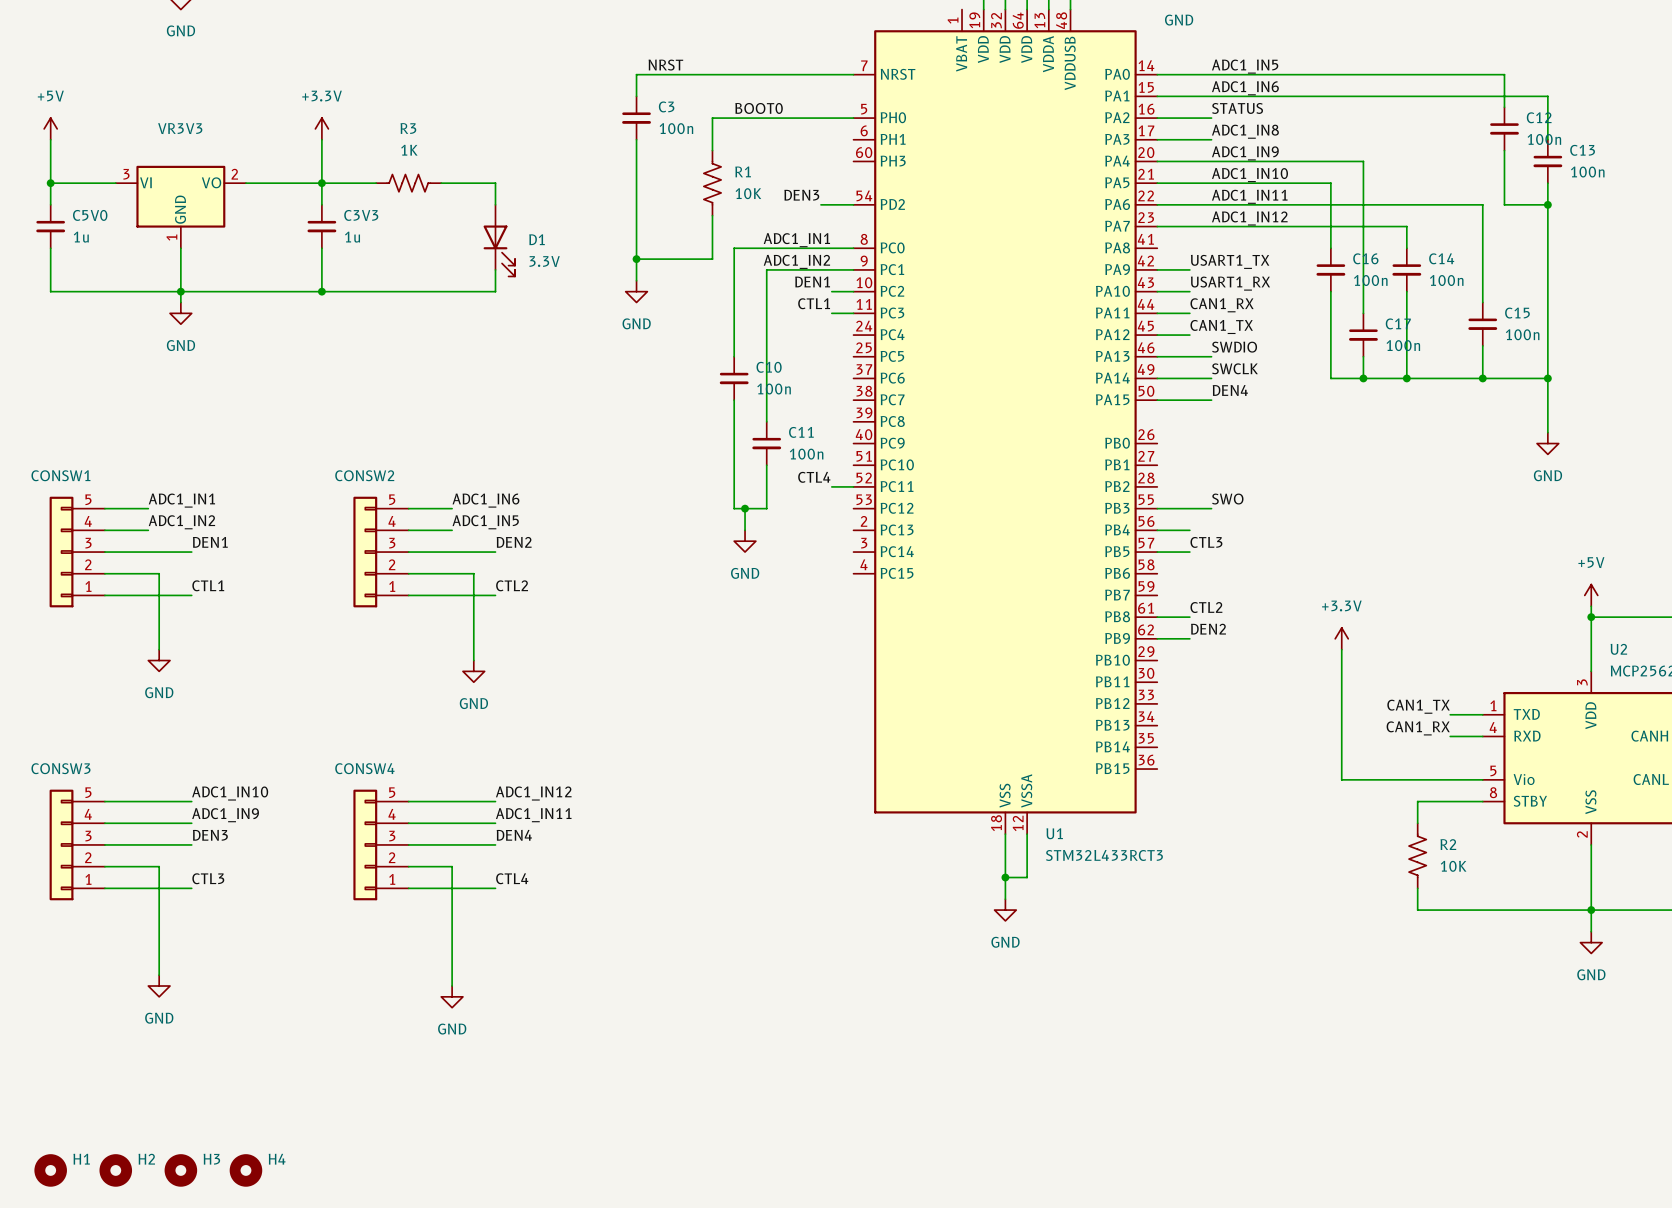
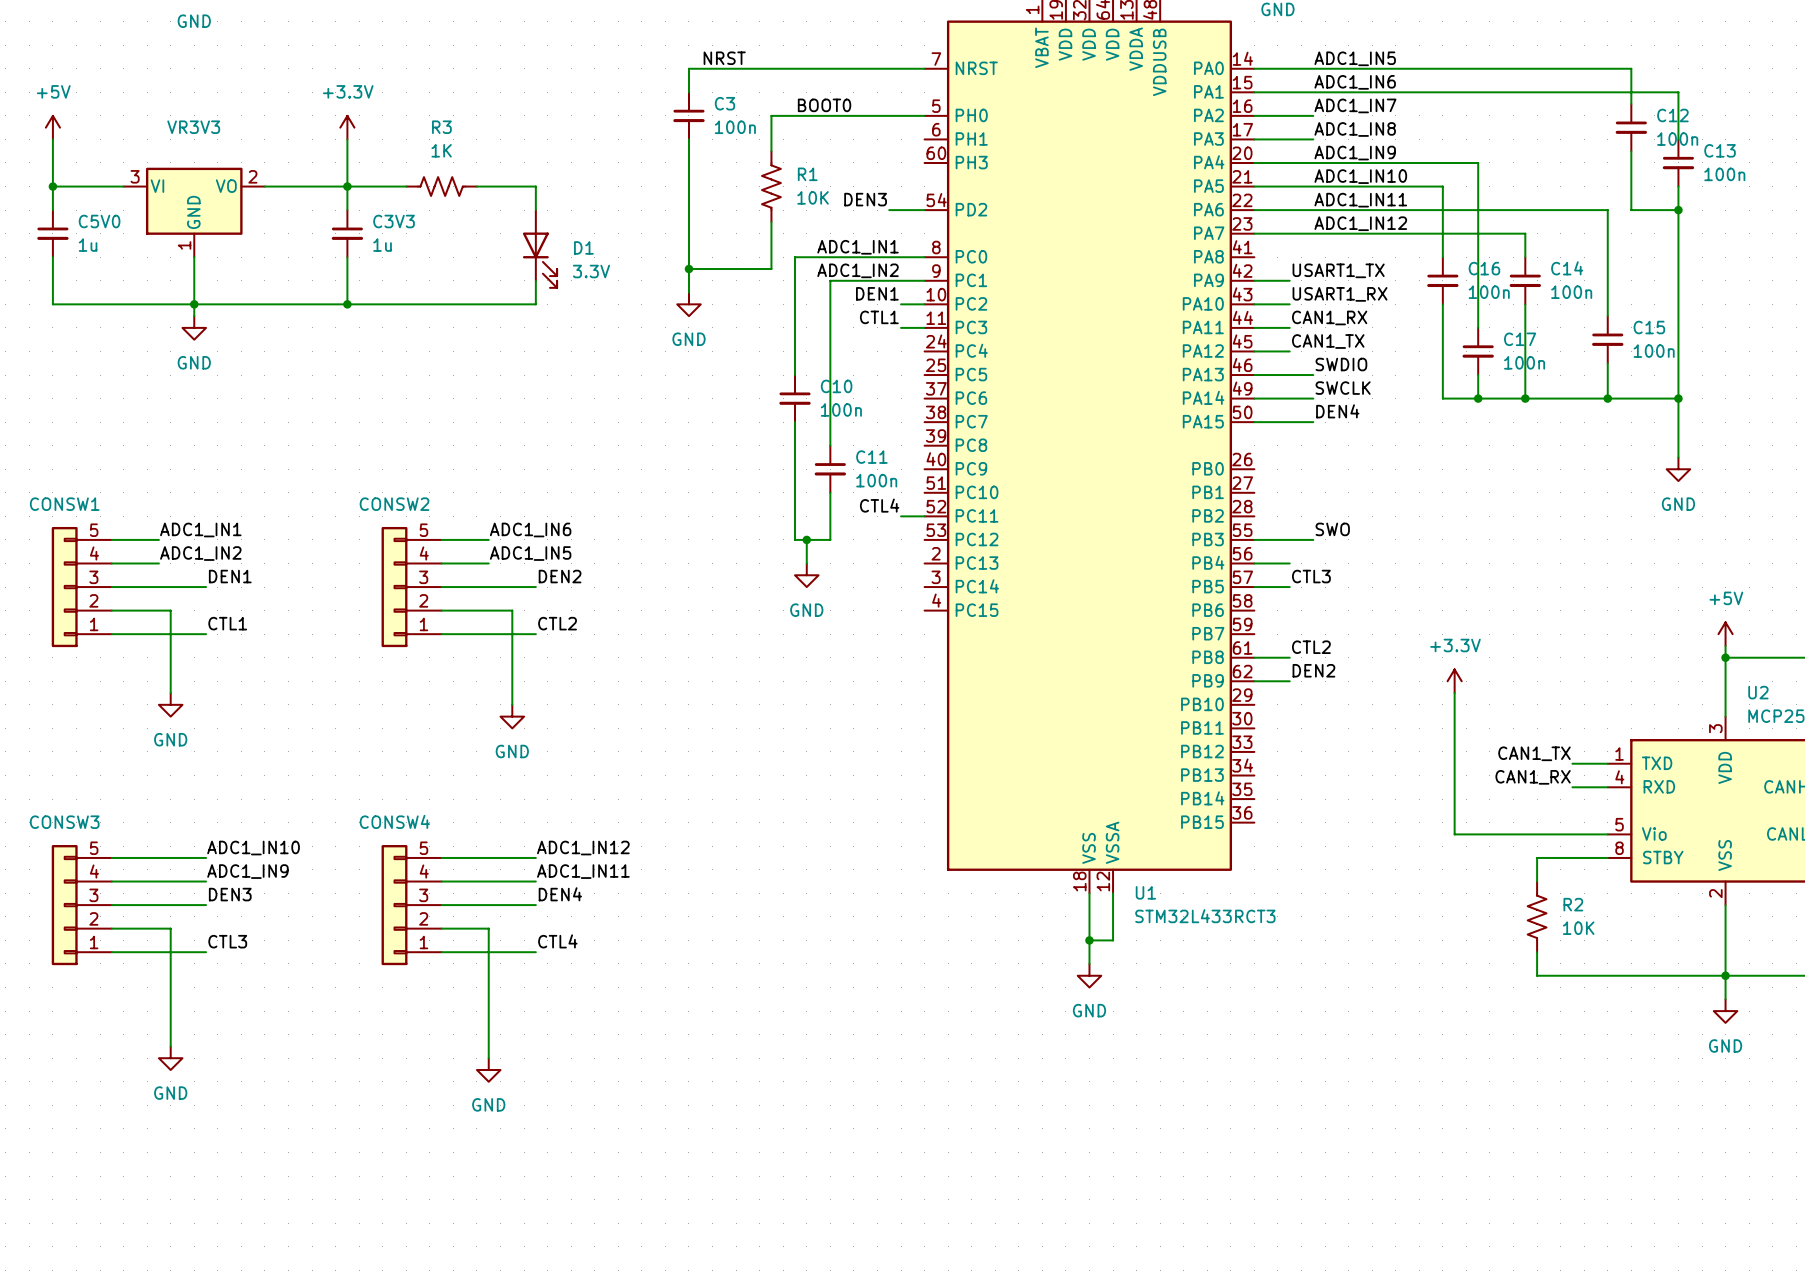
label: STATUS (1237, 108) -> ADC1_IN7 (1355, 105)
H1: (50, 1170) -> none
H2: (115, 1170) -> none
H3: (180, 1170) -> none
H4: (245, 1170) -> none

